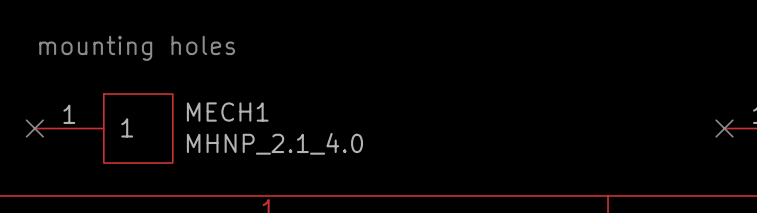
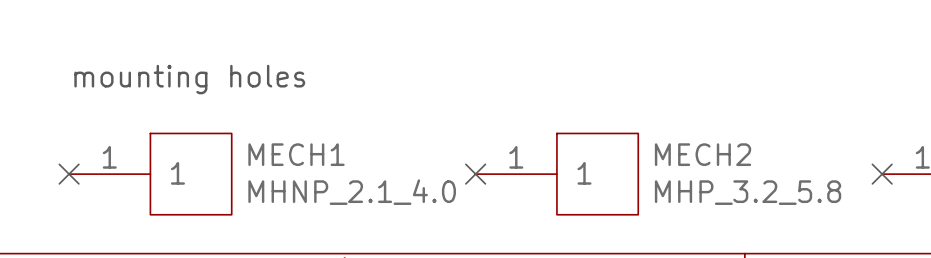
no-connect mark: none -> (475, 174)
MECH2: none -> MHP_3.2_5.8 (556, 174)

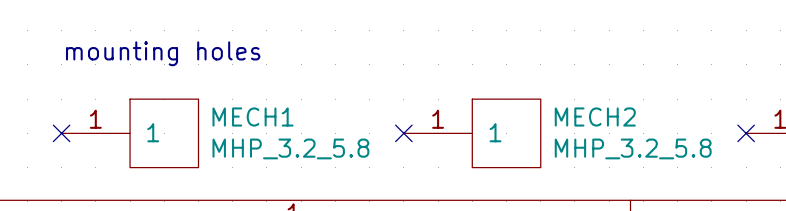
MECH1 value: MHNP_2.1_4.0 (352, 192) -> MHP_3.2_5.8 (290, 148)

